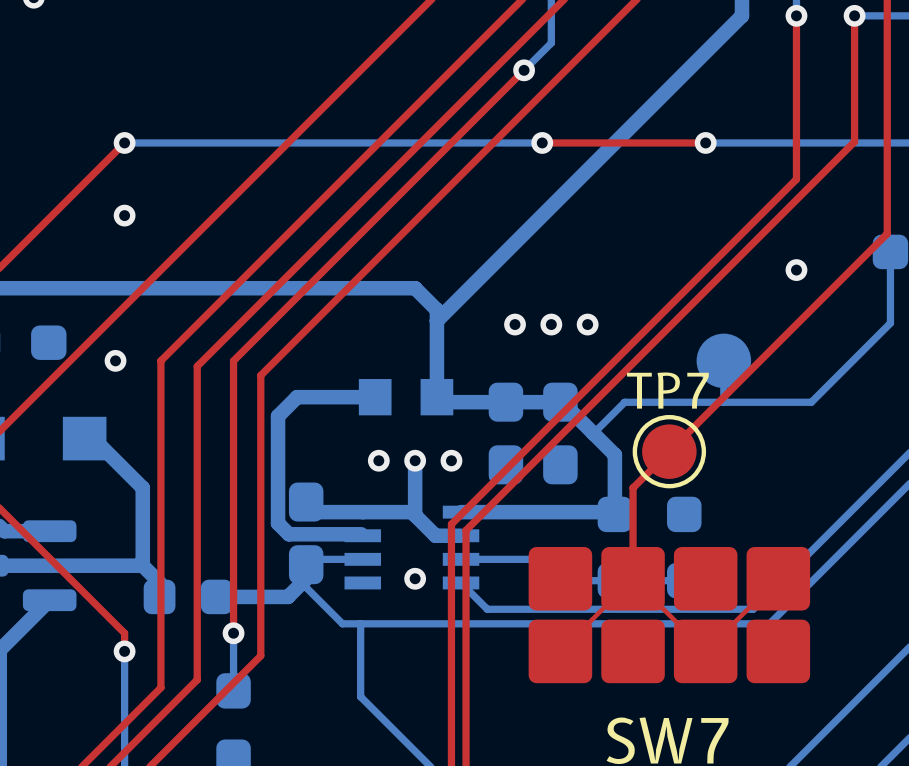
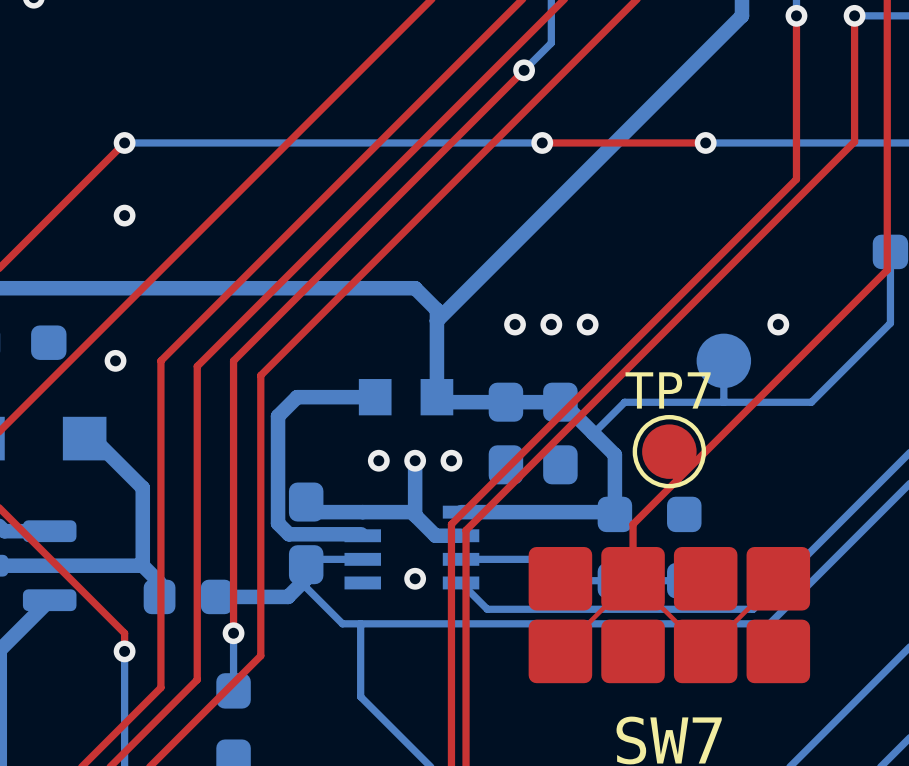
top track: (887, 233) (678, 442) -> (887, 233) (887, 270) (633, 524)
via position: (796, 270) -> (778, 324)
top track: (669, 451) (633, 487) (633, 524) -> none

